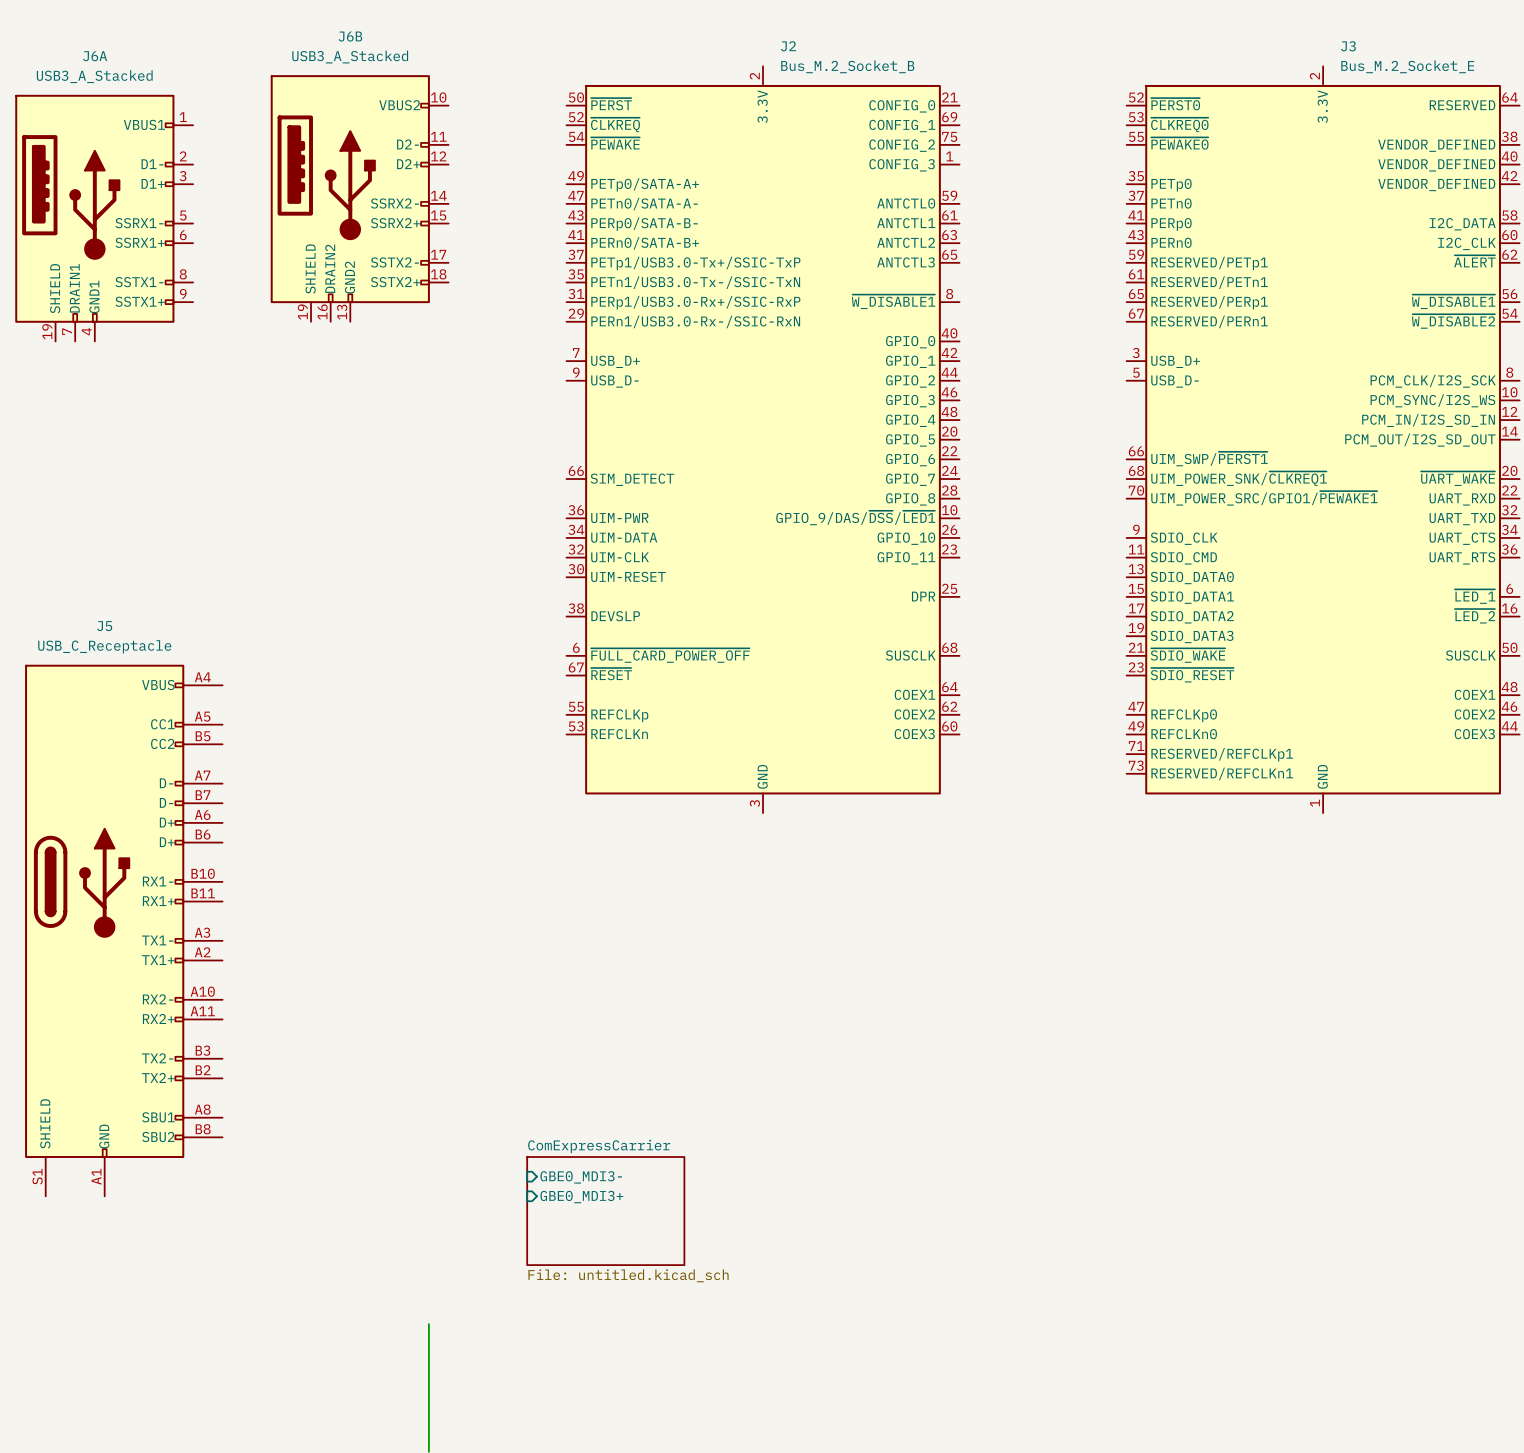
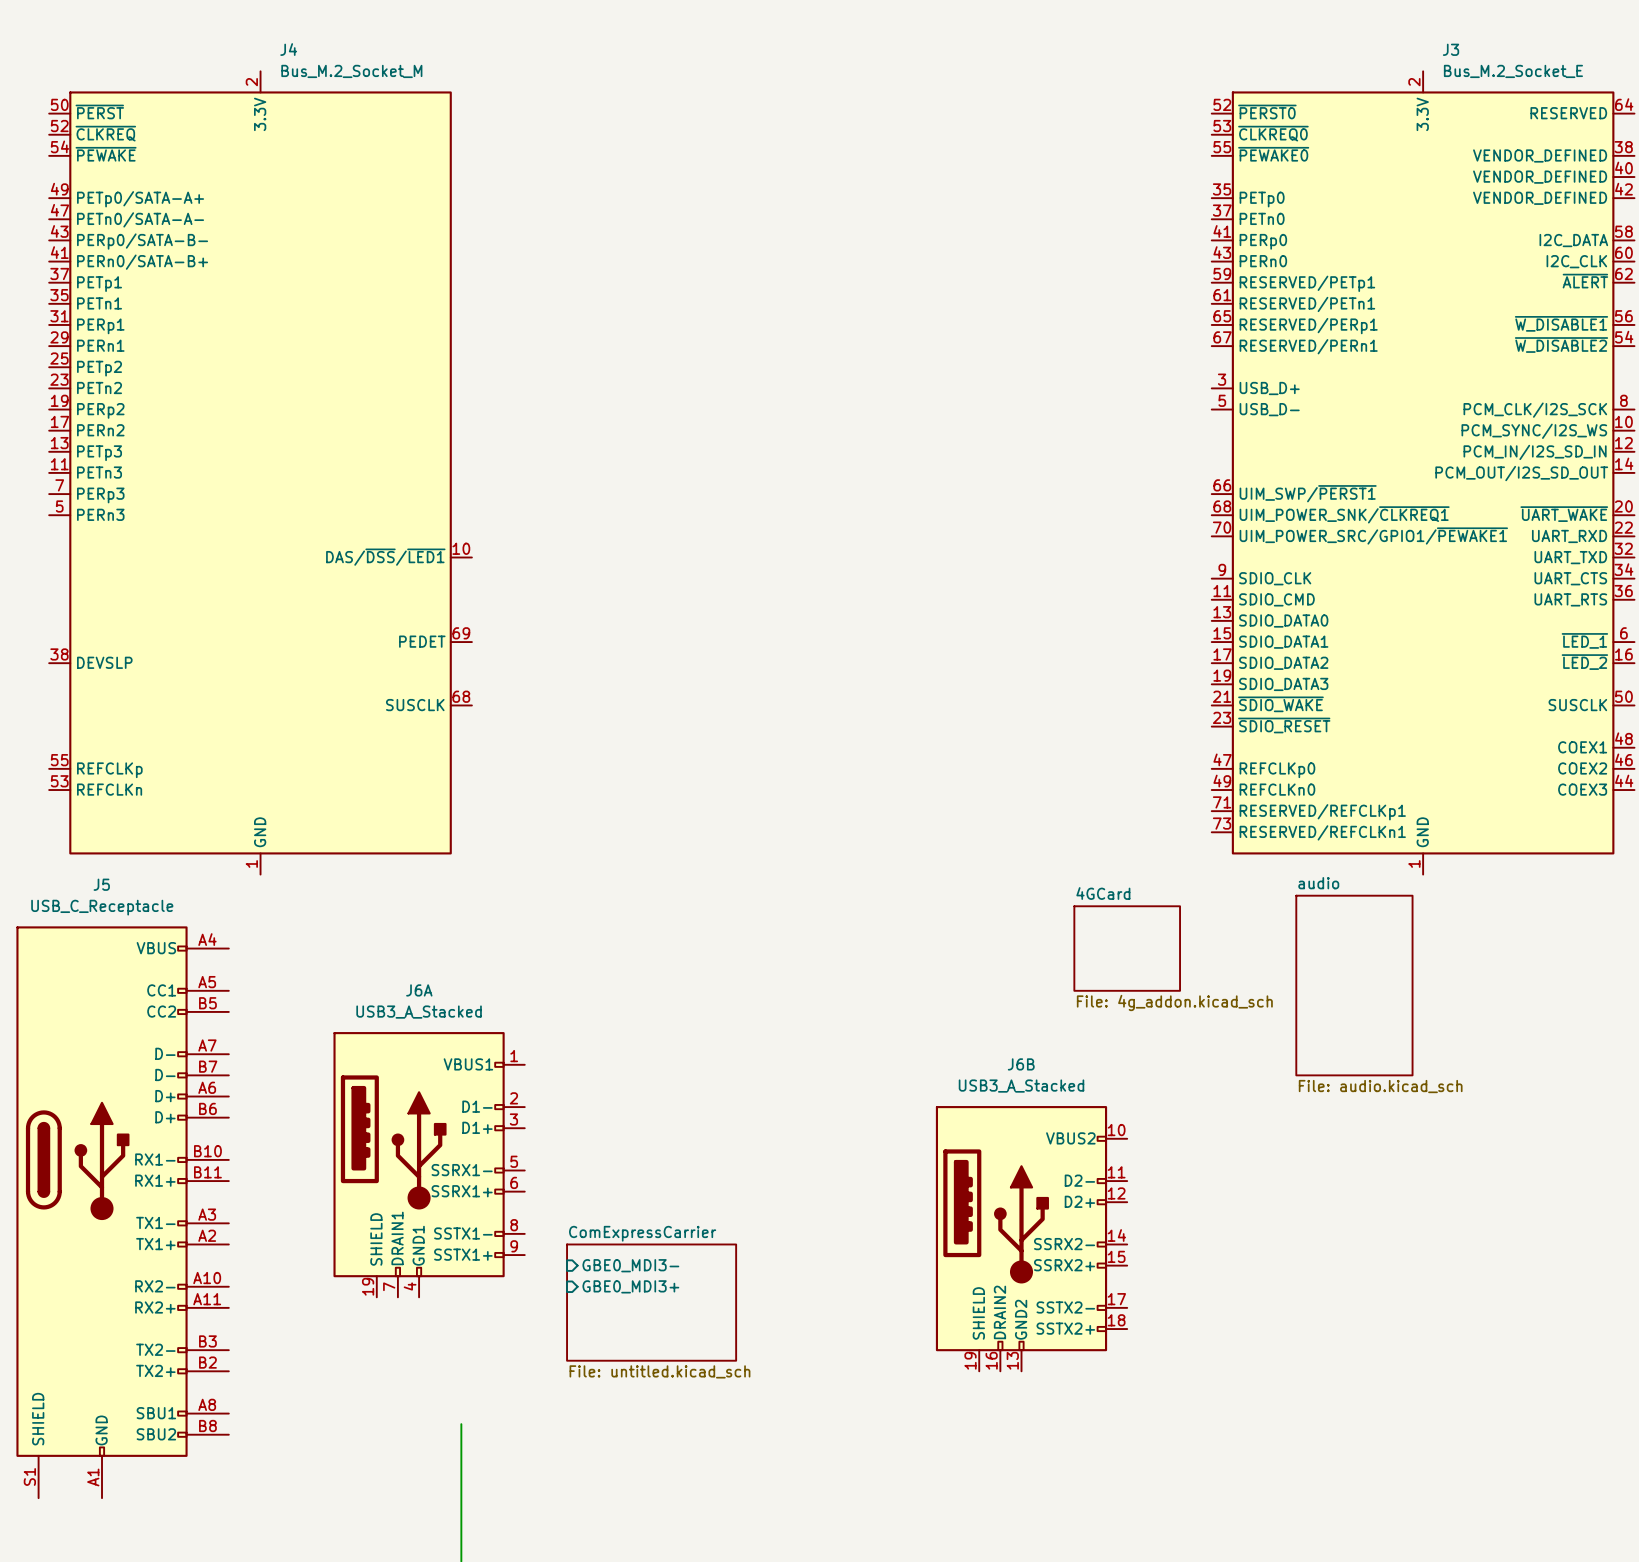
J6B position: (359, 198) -> (1031, 1238)
J6A position: (104, 218) -> (429, 1164)
J4: none -> Bus_M.2_Socket_M (260, 472)
J2: Bus_M.2_Socket_B (763, 439) -> none
sheet 4GCard: none -> File: 4g_addon.kicad_sch (1127, 948)
sheet audio: none -> File: audio.kicad_sch (1354, 985)
J5 position: (123, 930) -> (122, 1212)

